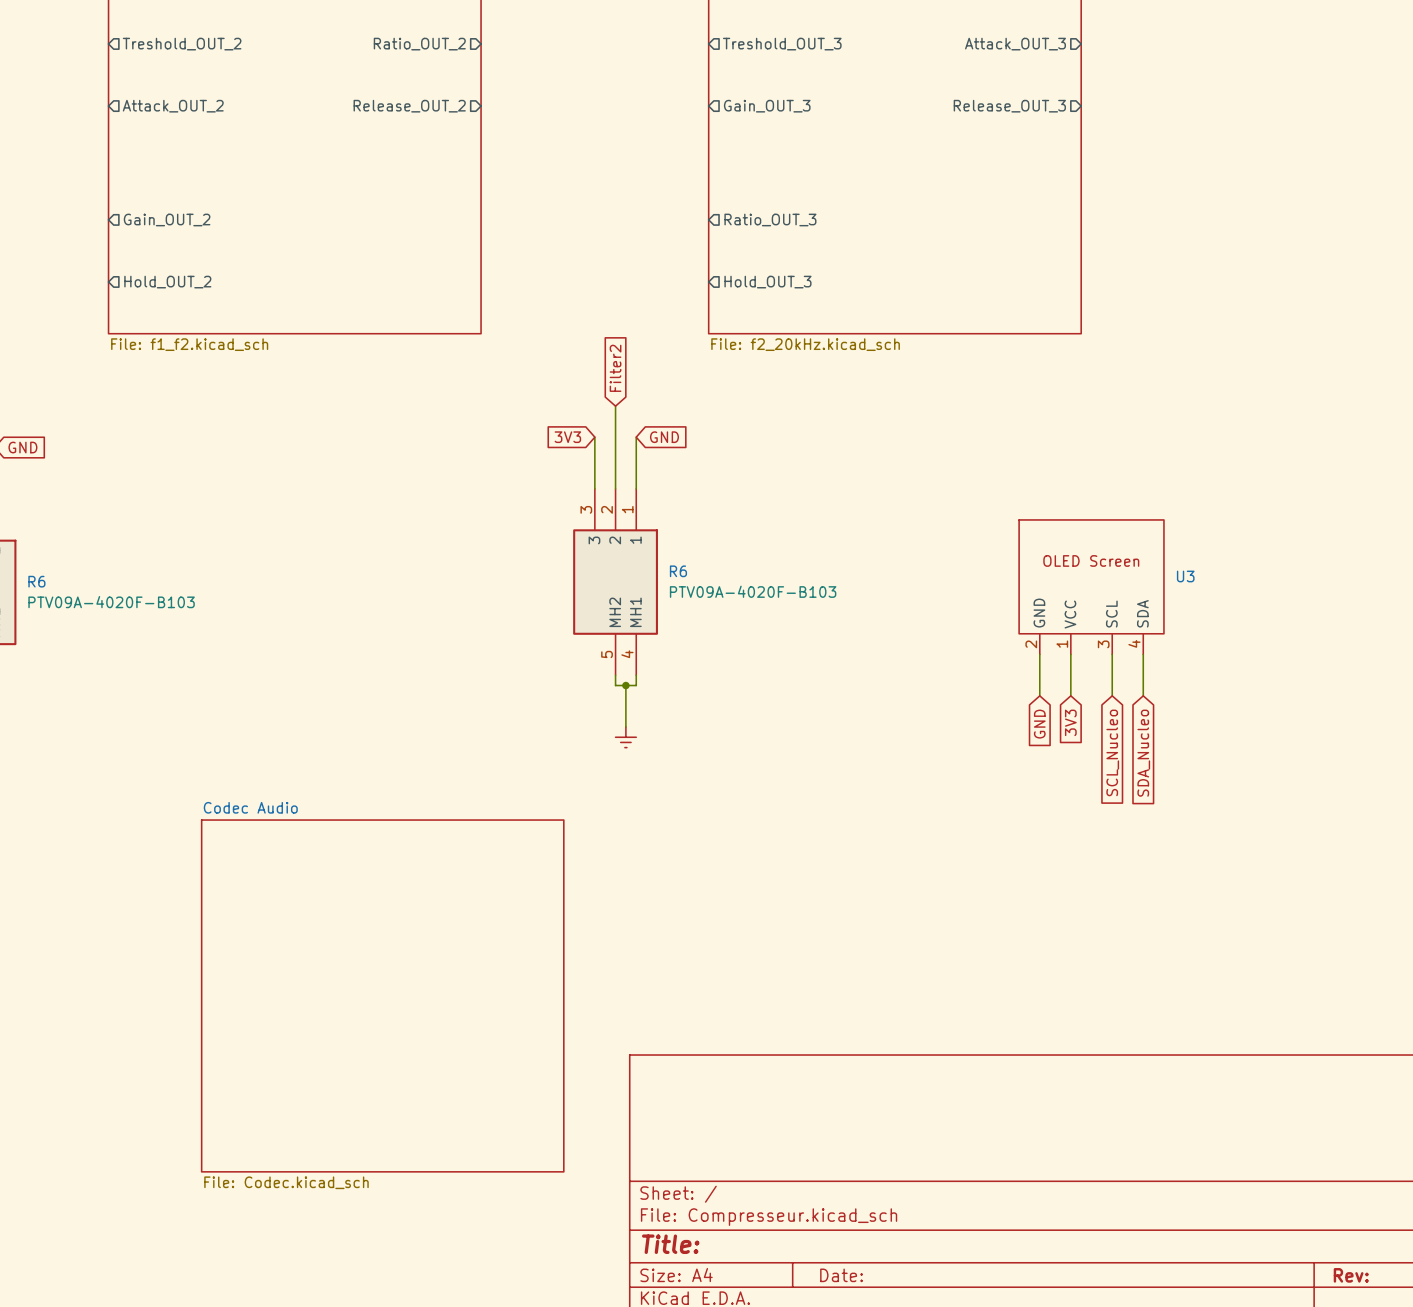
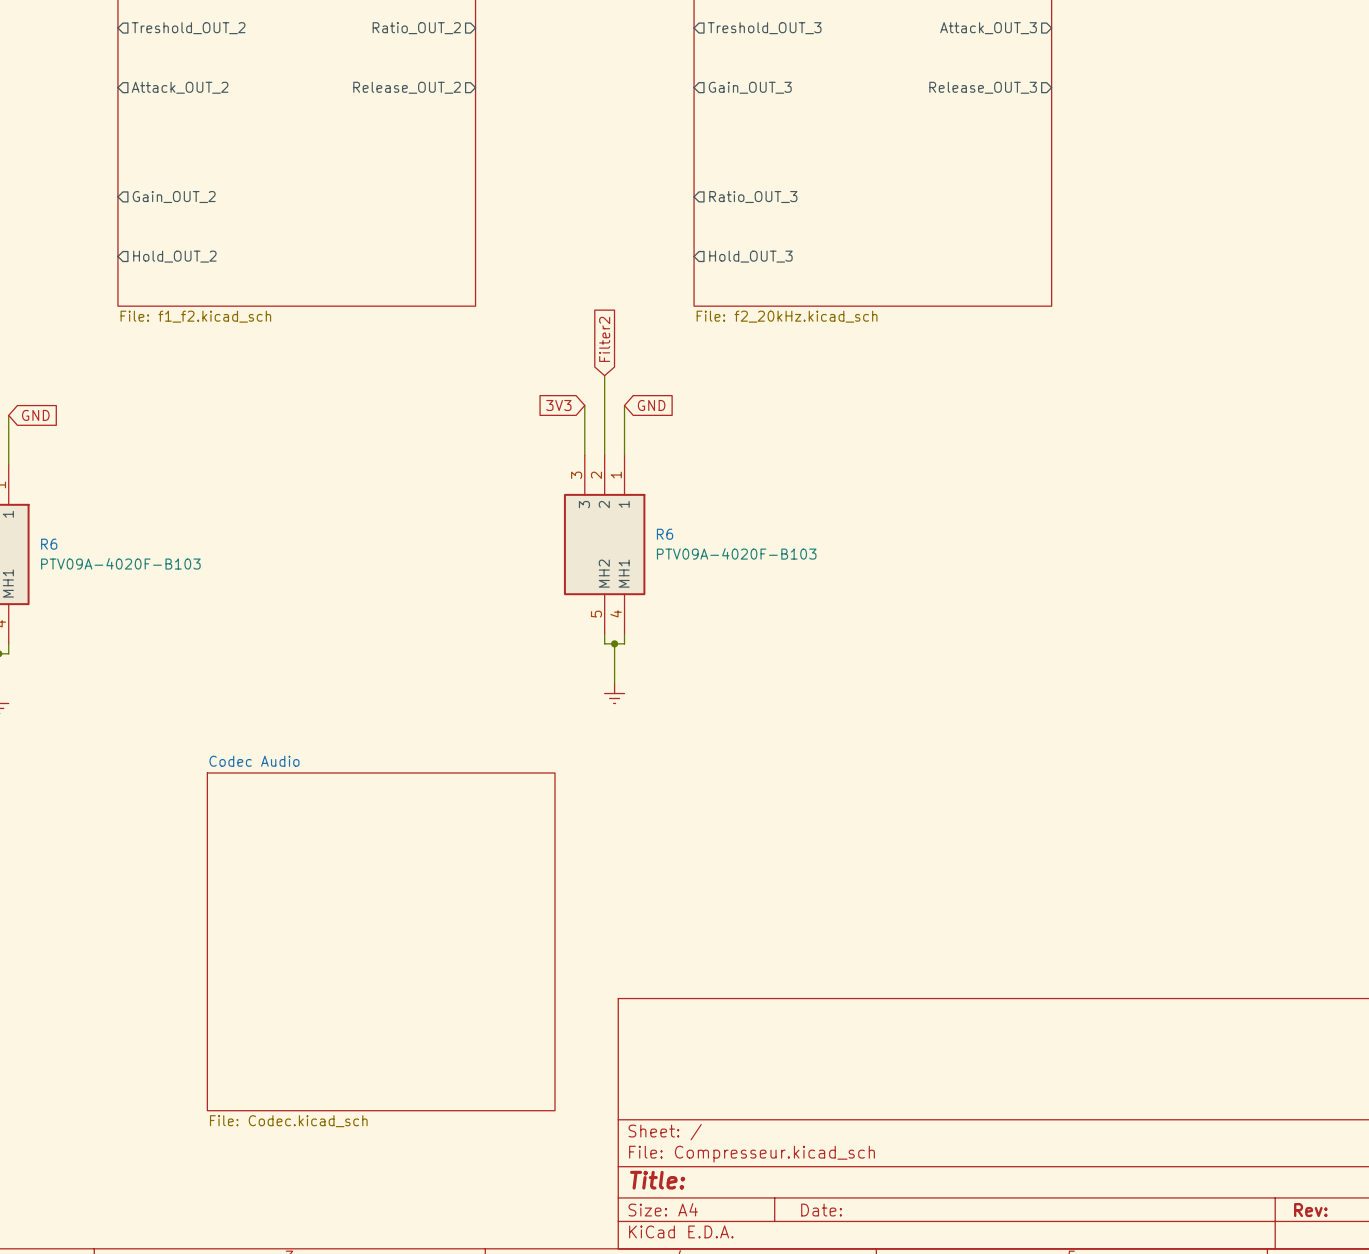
U3: (1091, 587) -> none
wire: (1039, 654) (1039, 695) -> none
wire: (1070, 654) (1070, 695) -> none
wire: (1112, 654) (1112, 695) -> none
wire: (1143, 654) (1143, 695) -> none
global label: 3V3 (1070, 722) -> none
global label: GND (1039, 724) -> none
global label: SCL_Nucleo (1112, 752) -> none
global label: SDA_Nucleo (1143, 753) -> none

